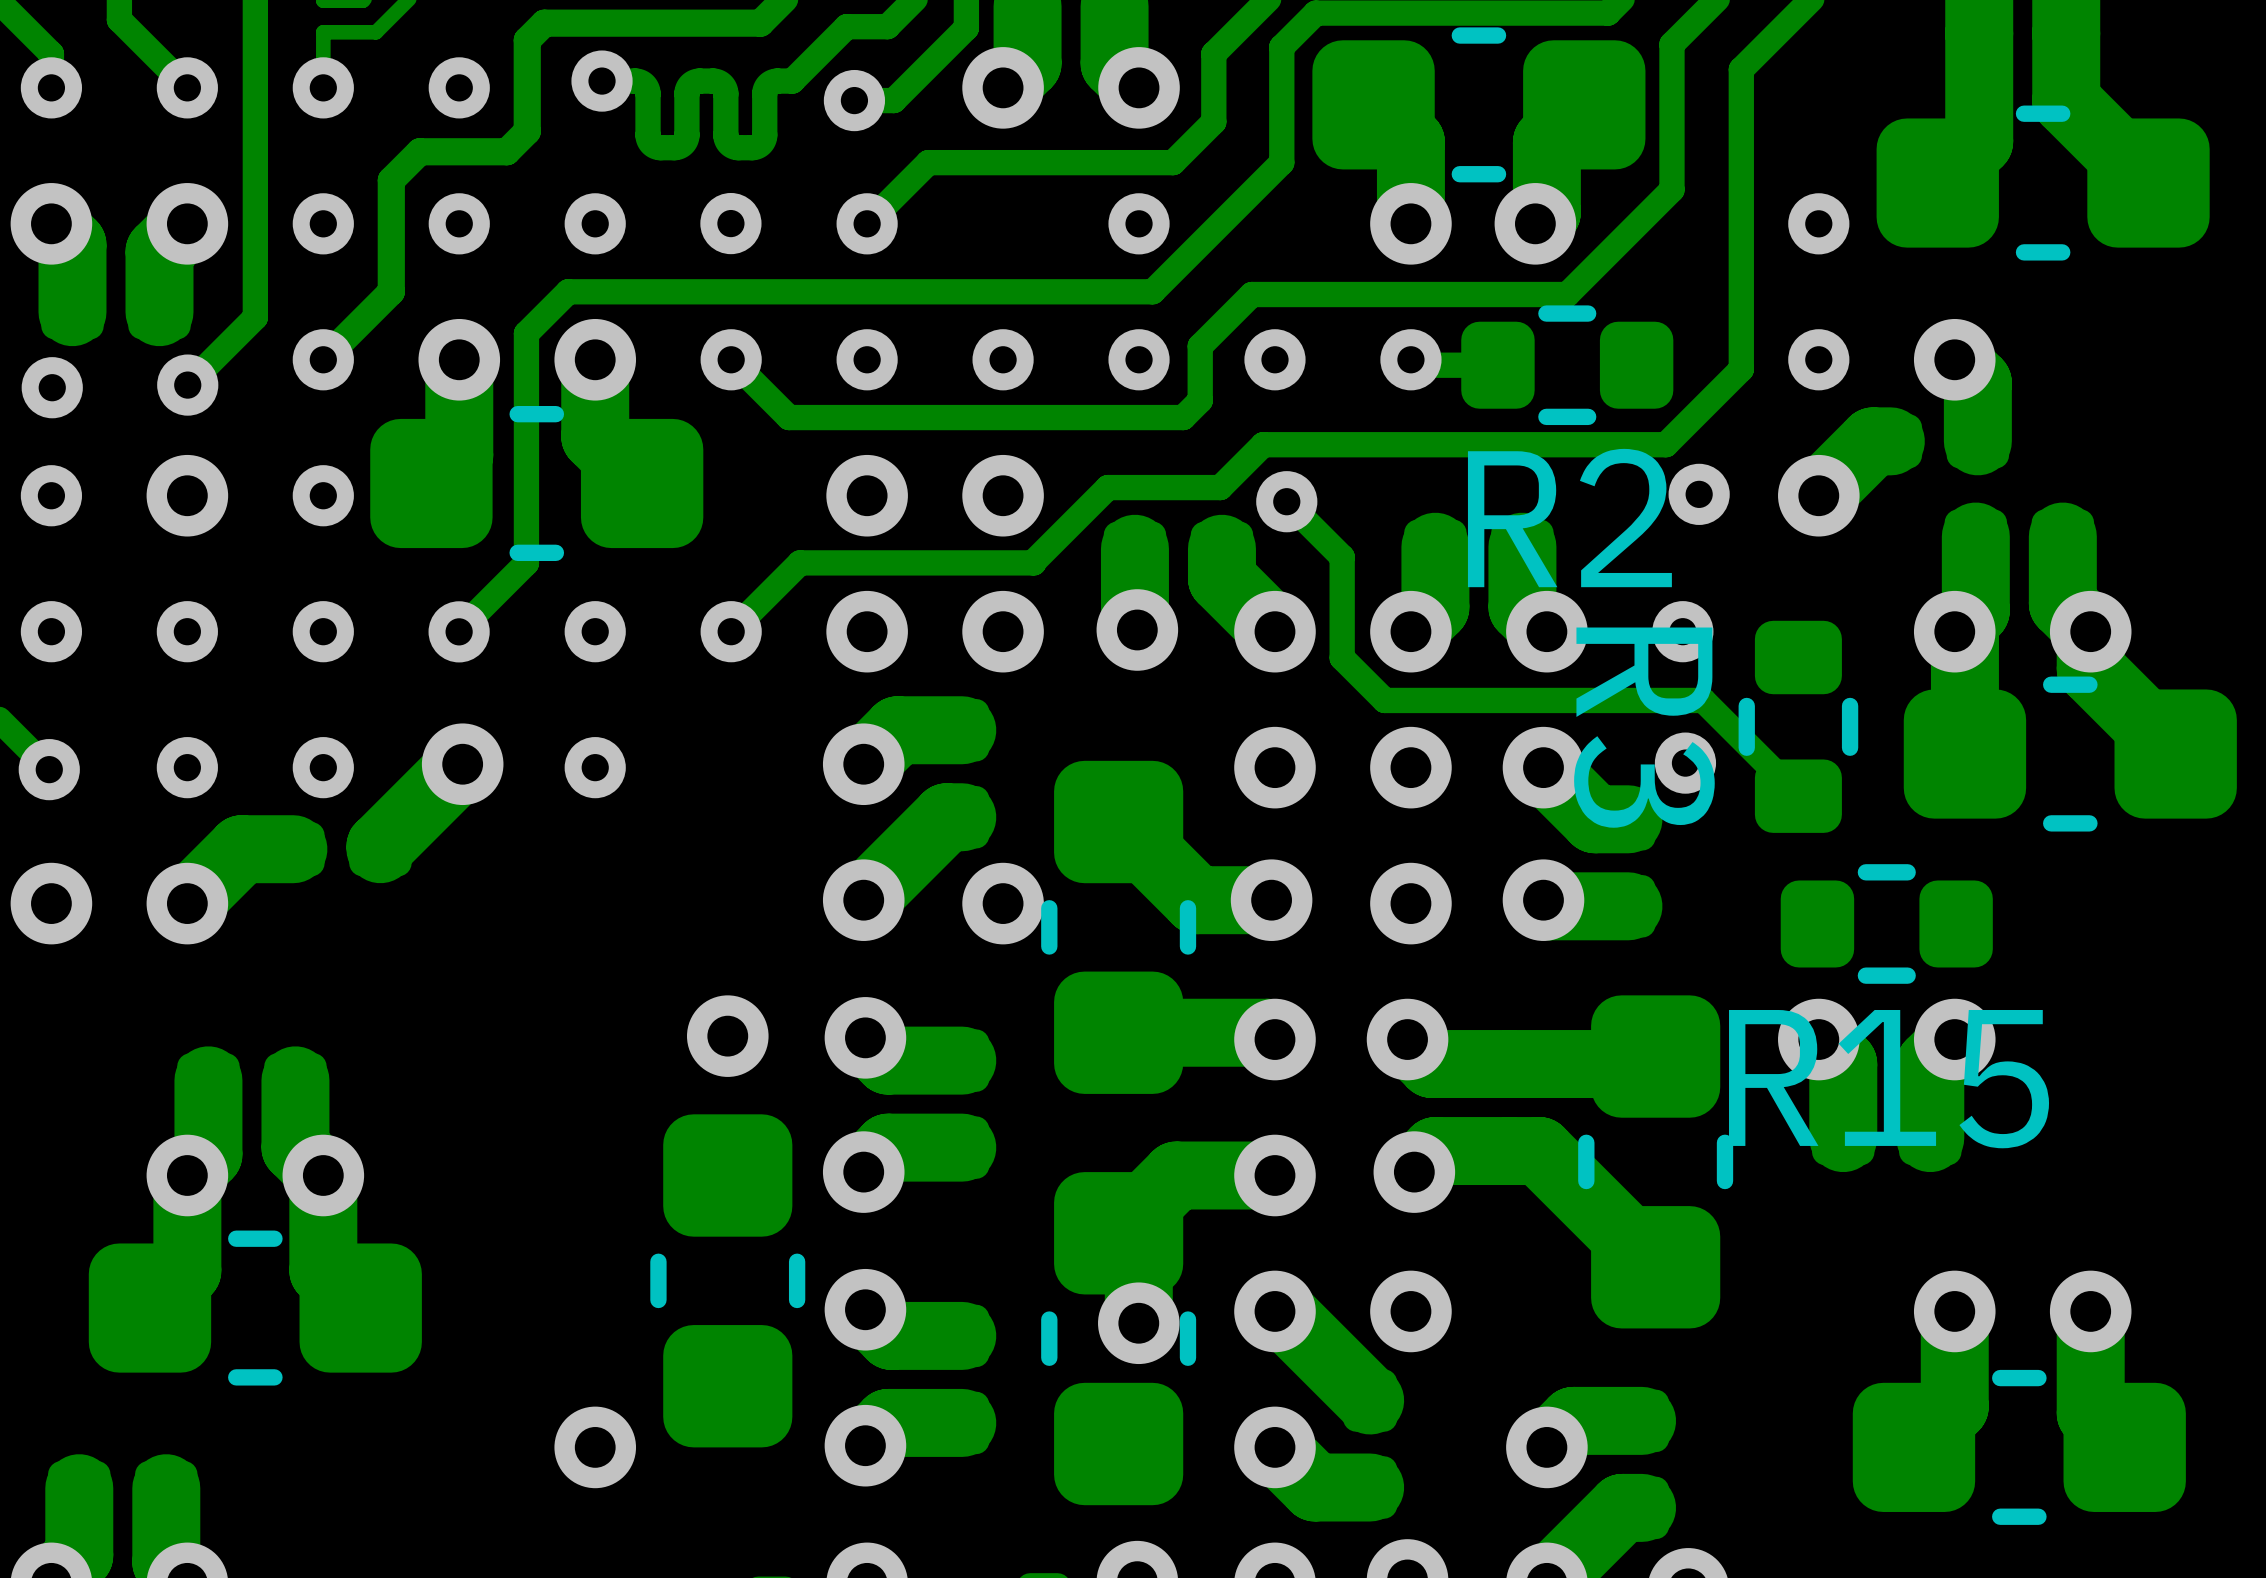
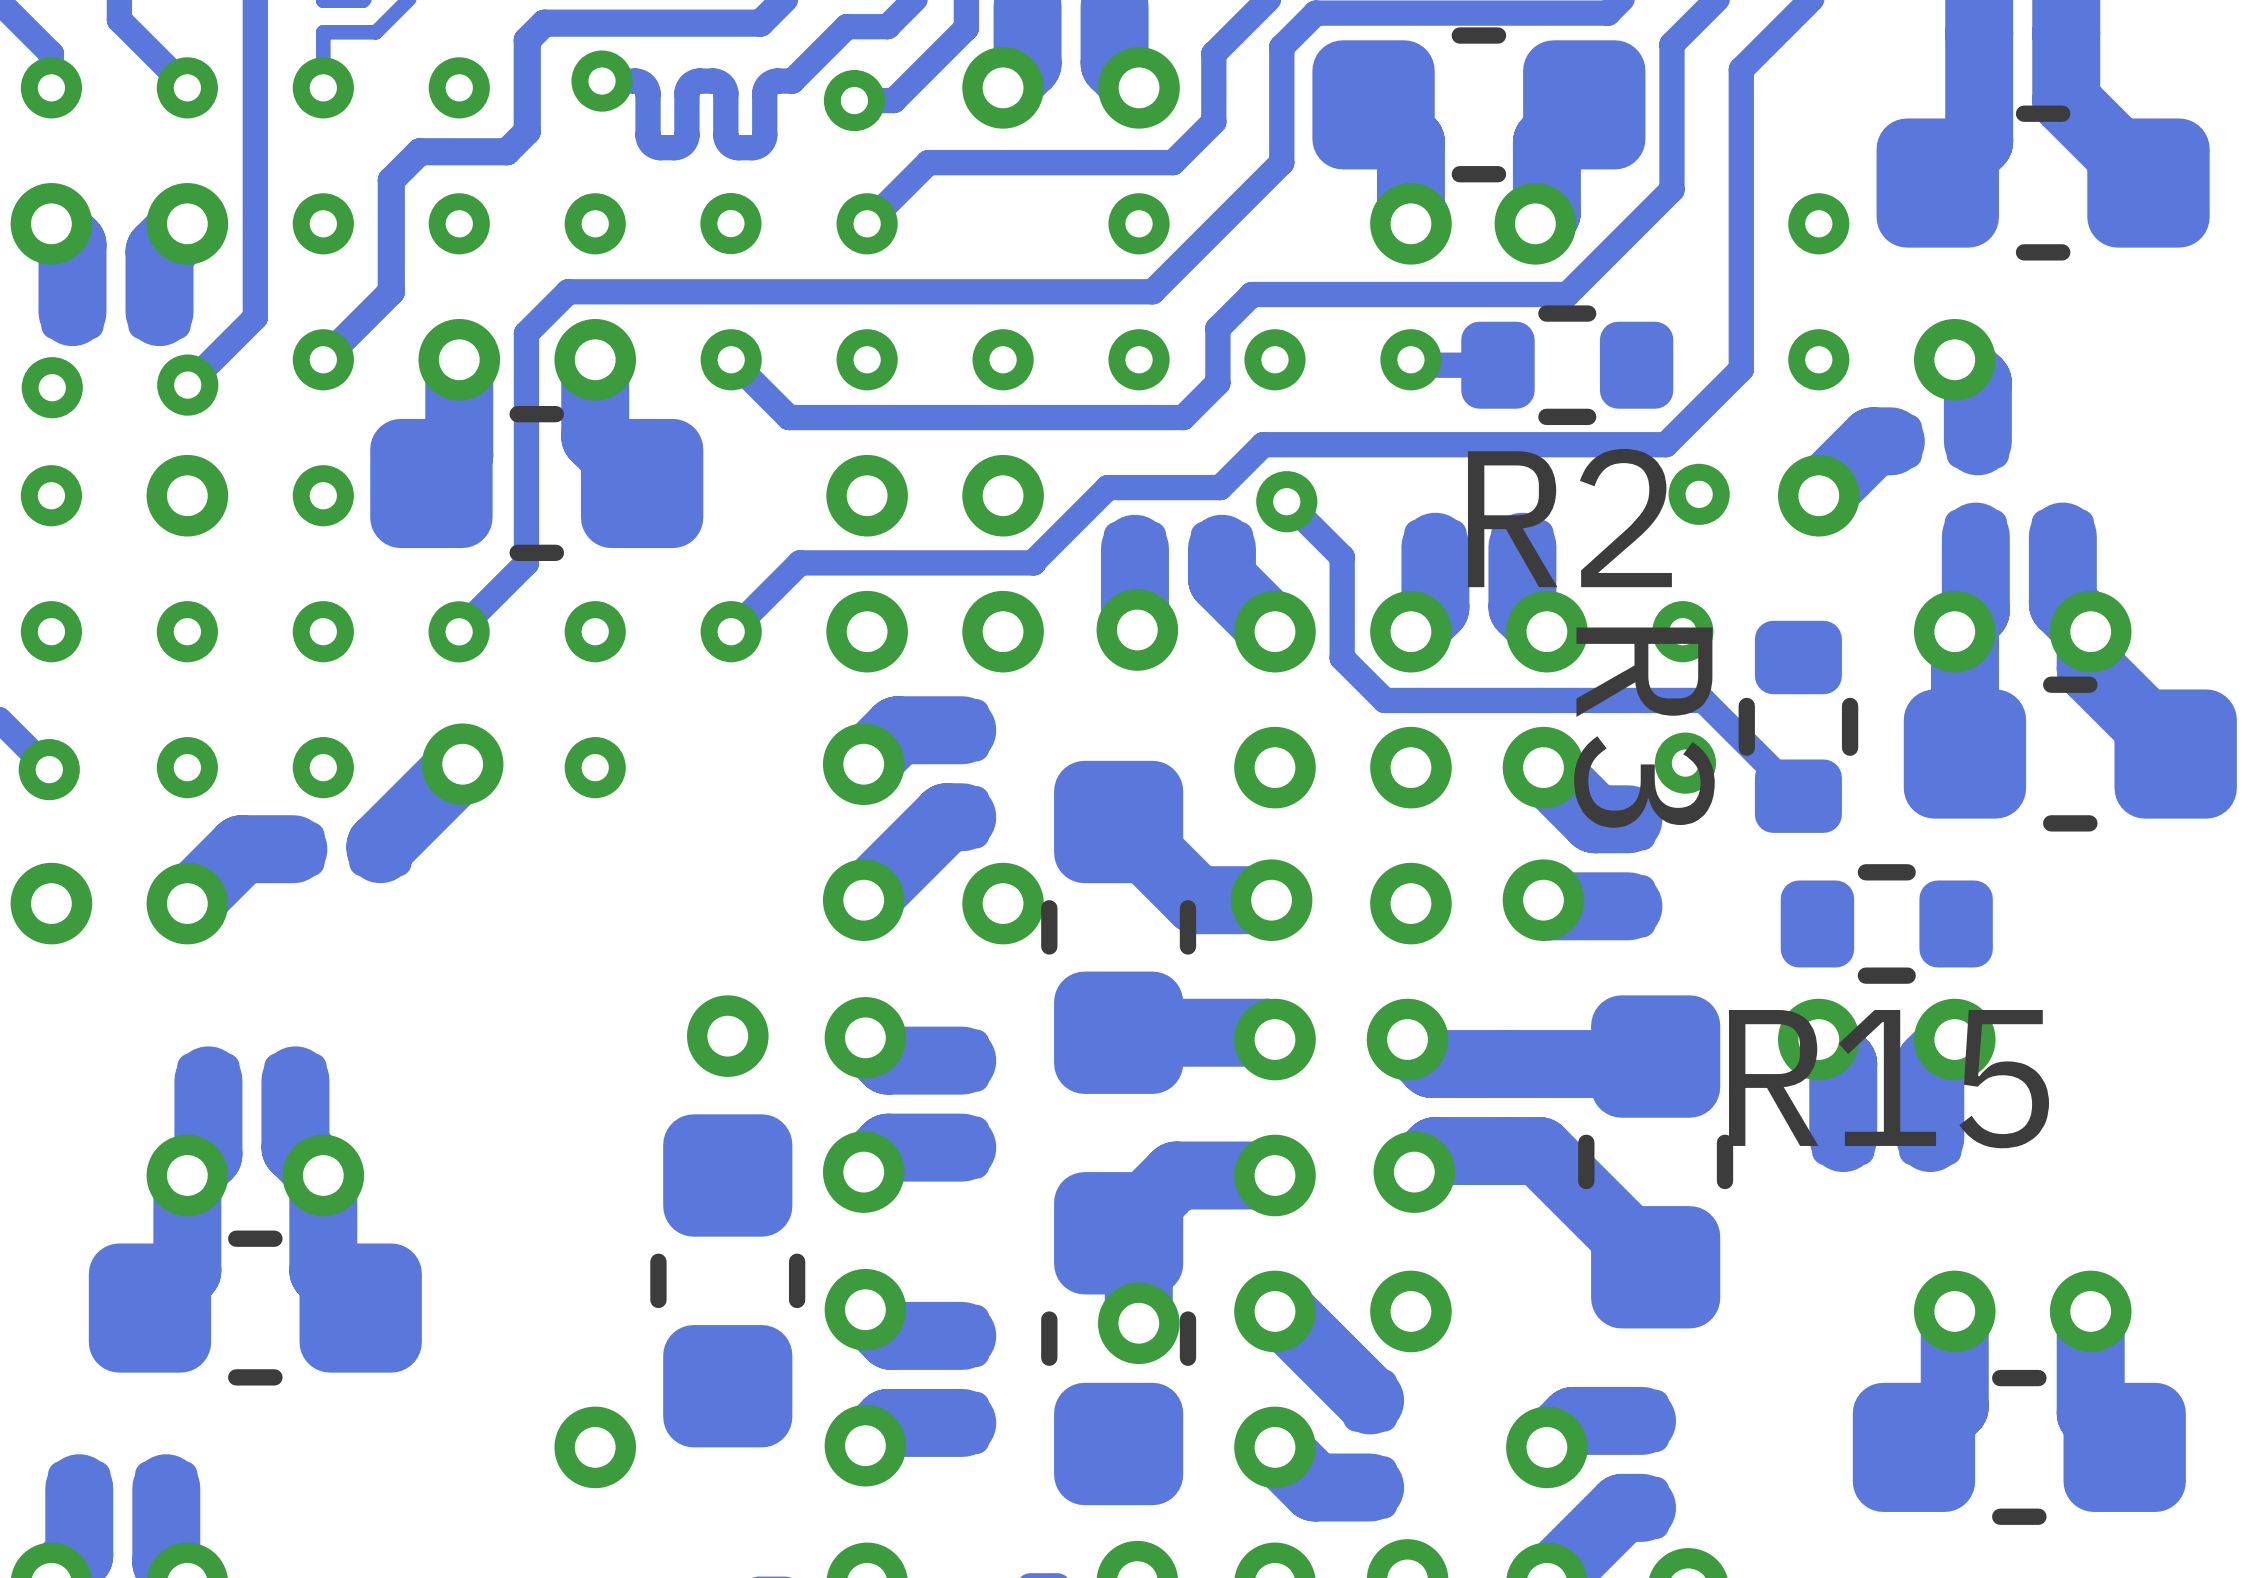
track: (1217, 328) (1200, 346) (1200, 400) -> (1217, 328) (1217, 382) (1200, 400)

